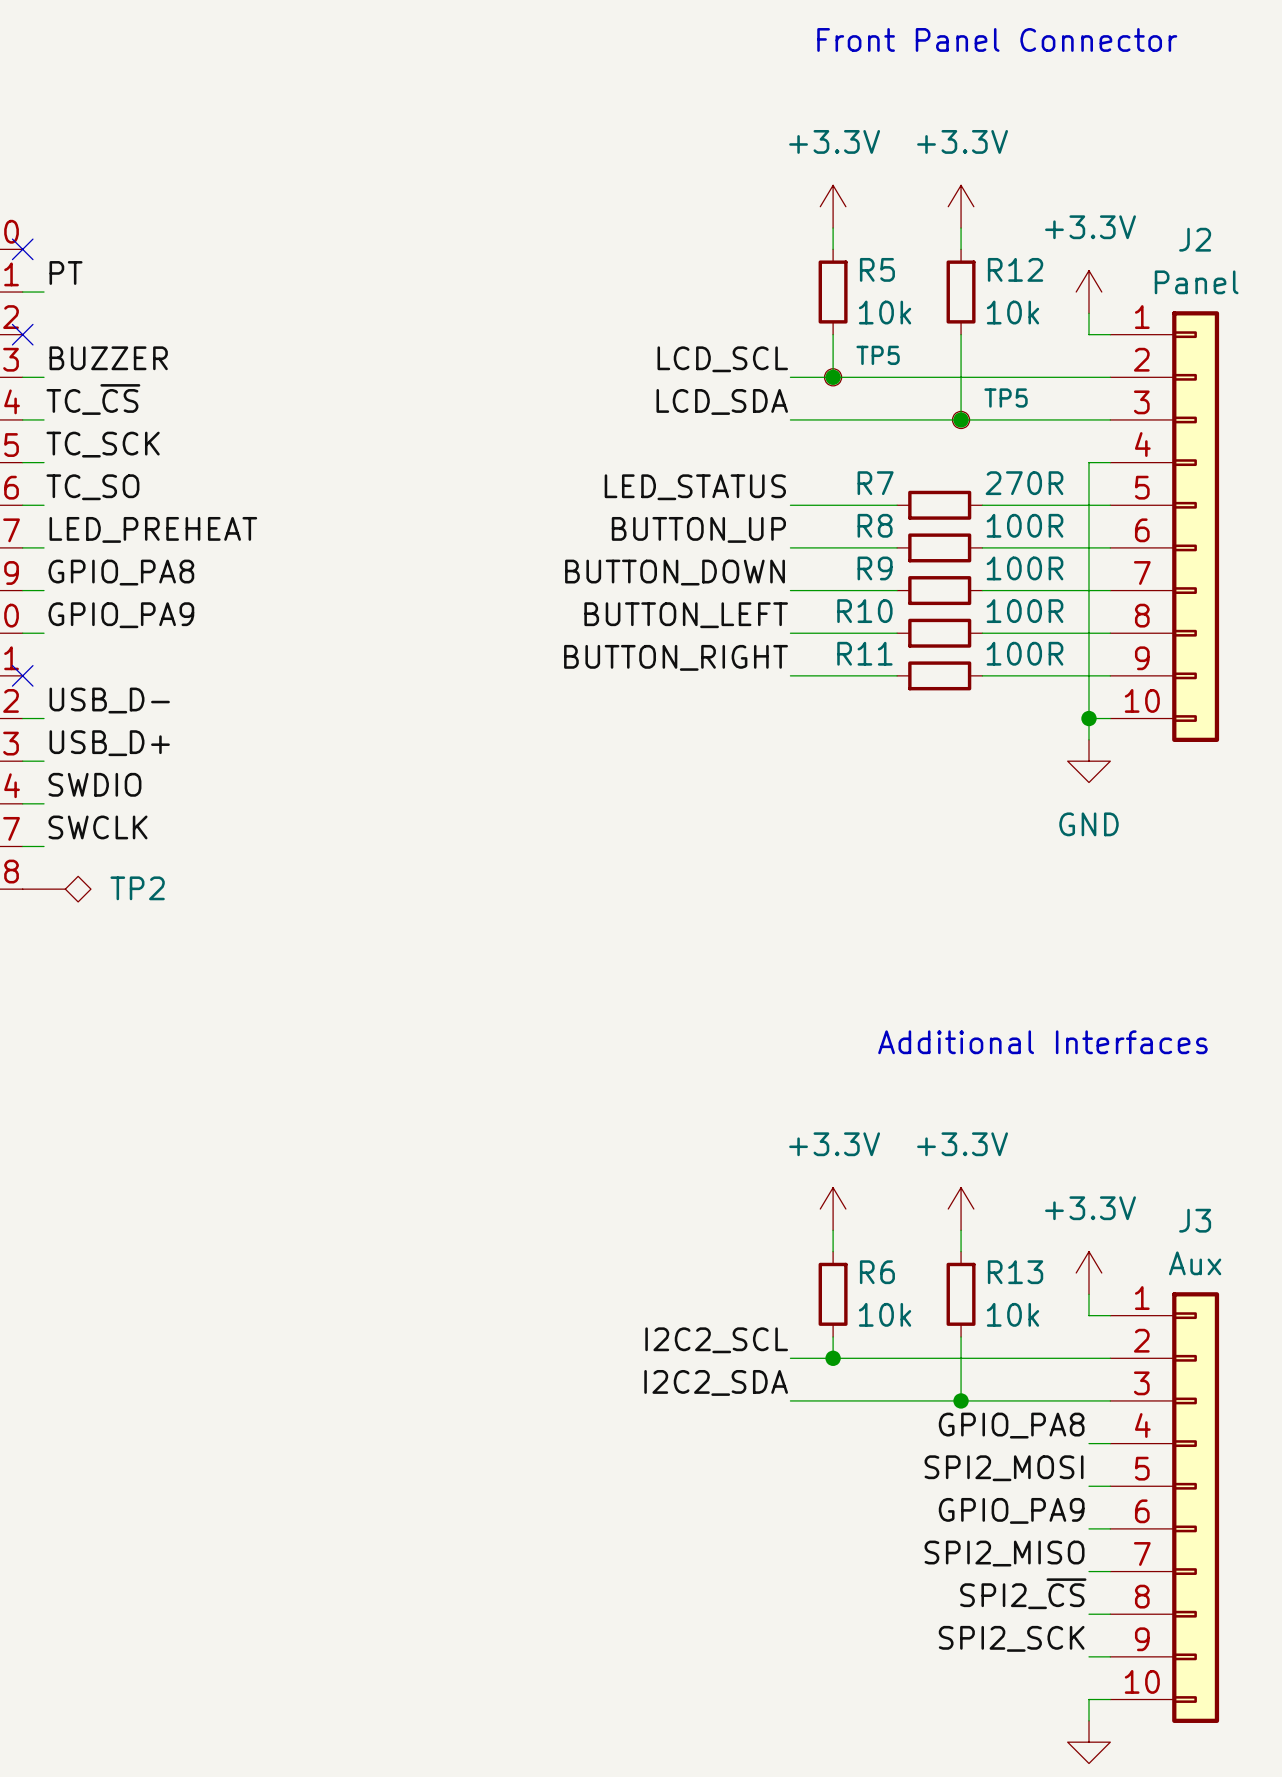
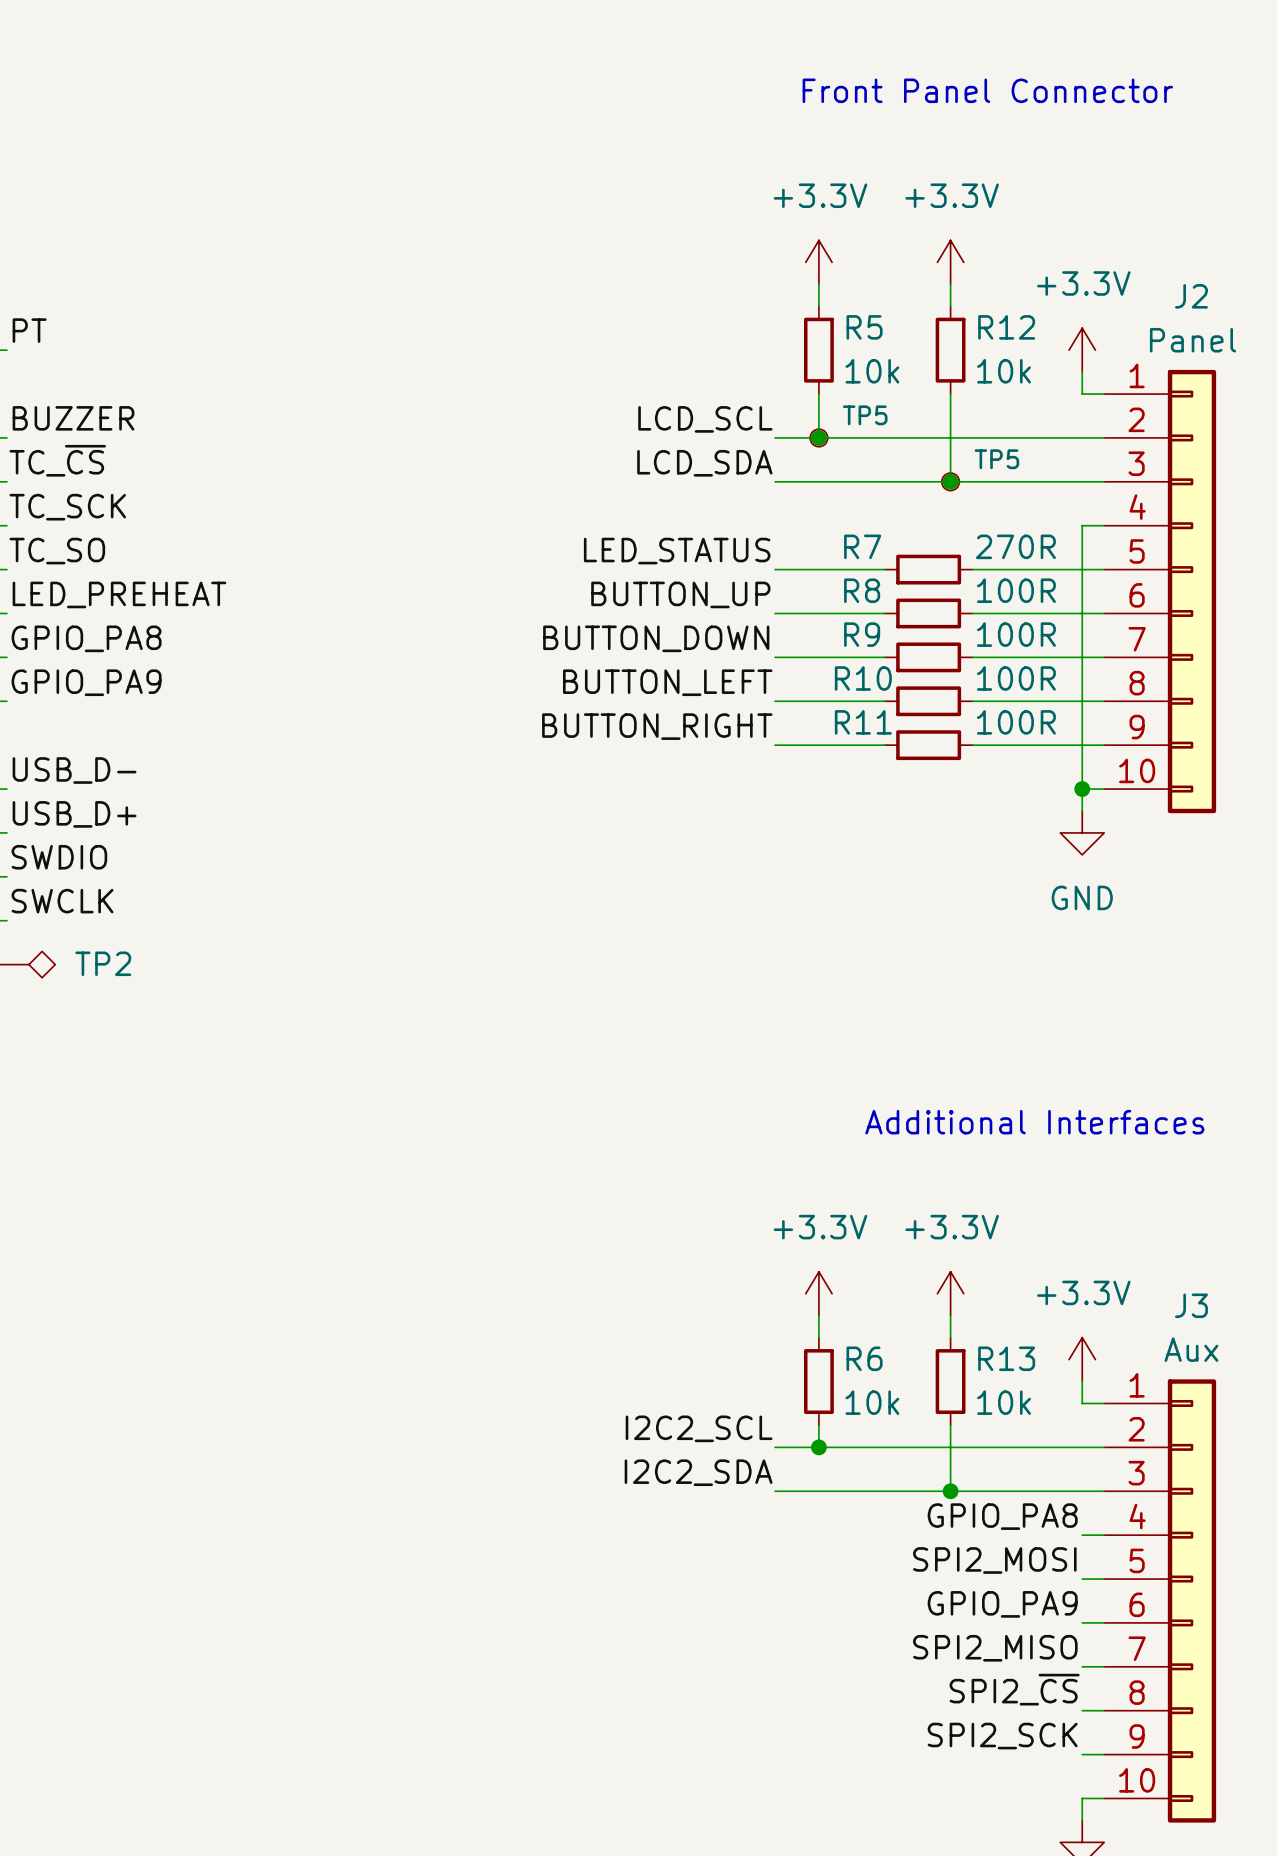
R10 name position: R10 (864, 611) -> R10 (863, 678)
R11 name position: R11 (864, 653) -> R11 (863, 722)

